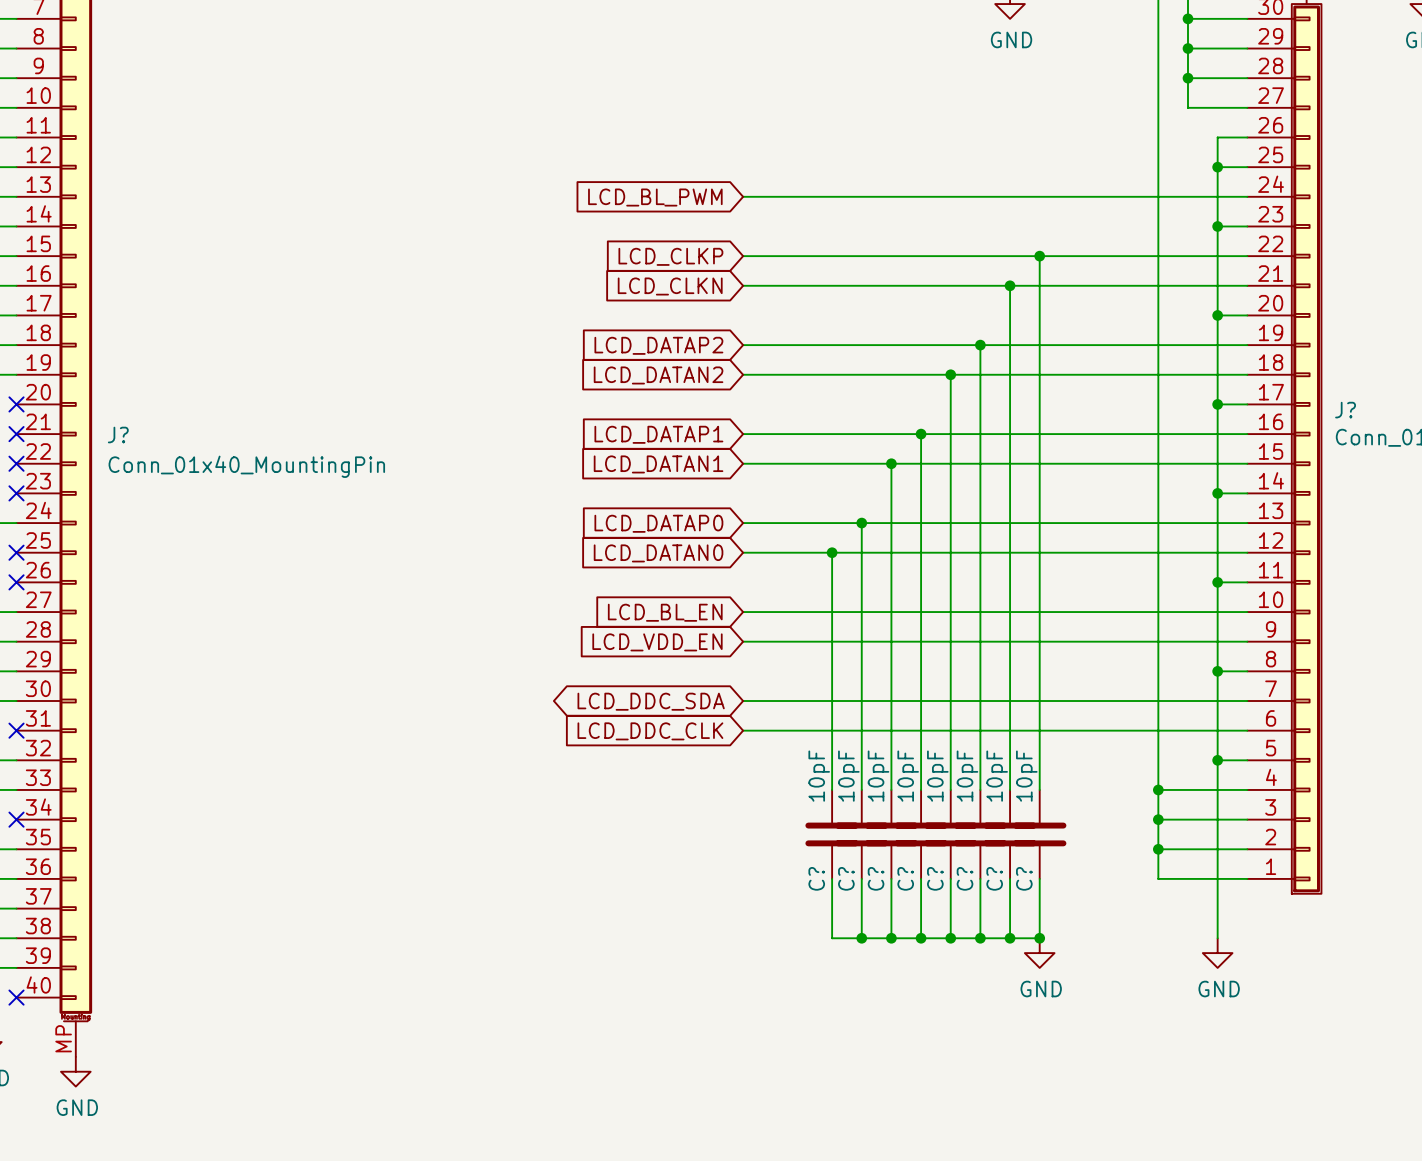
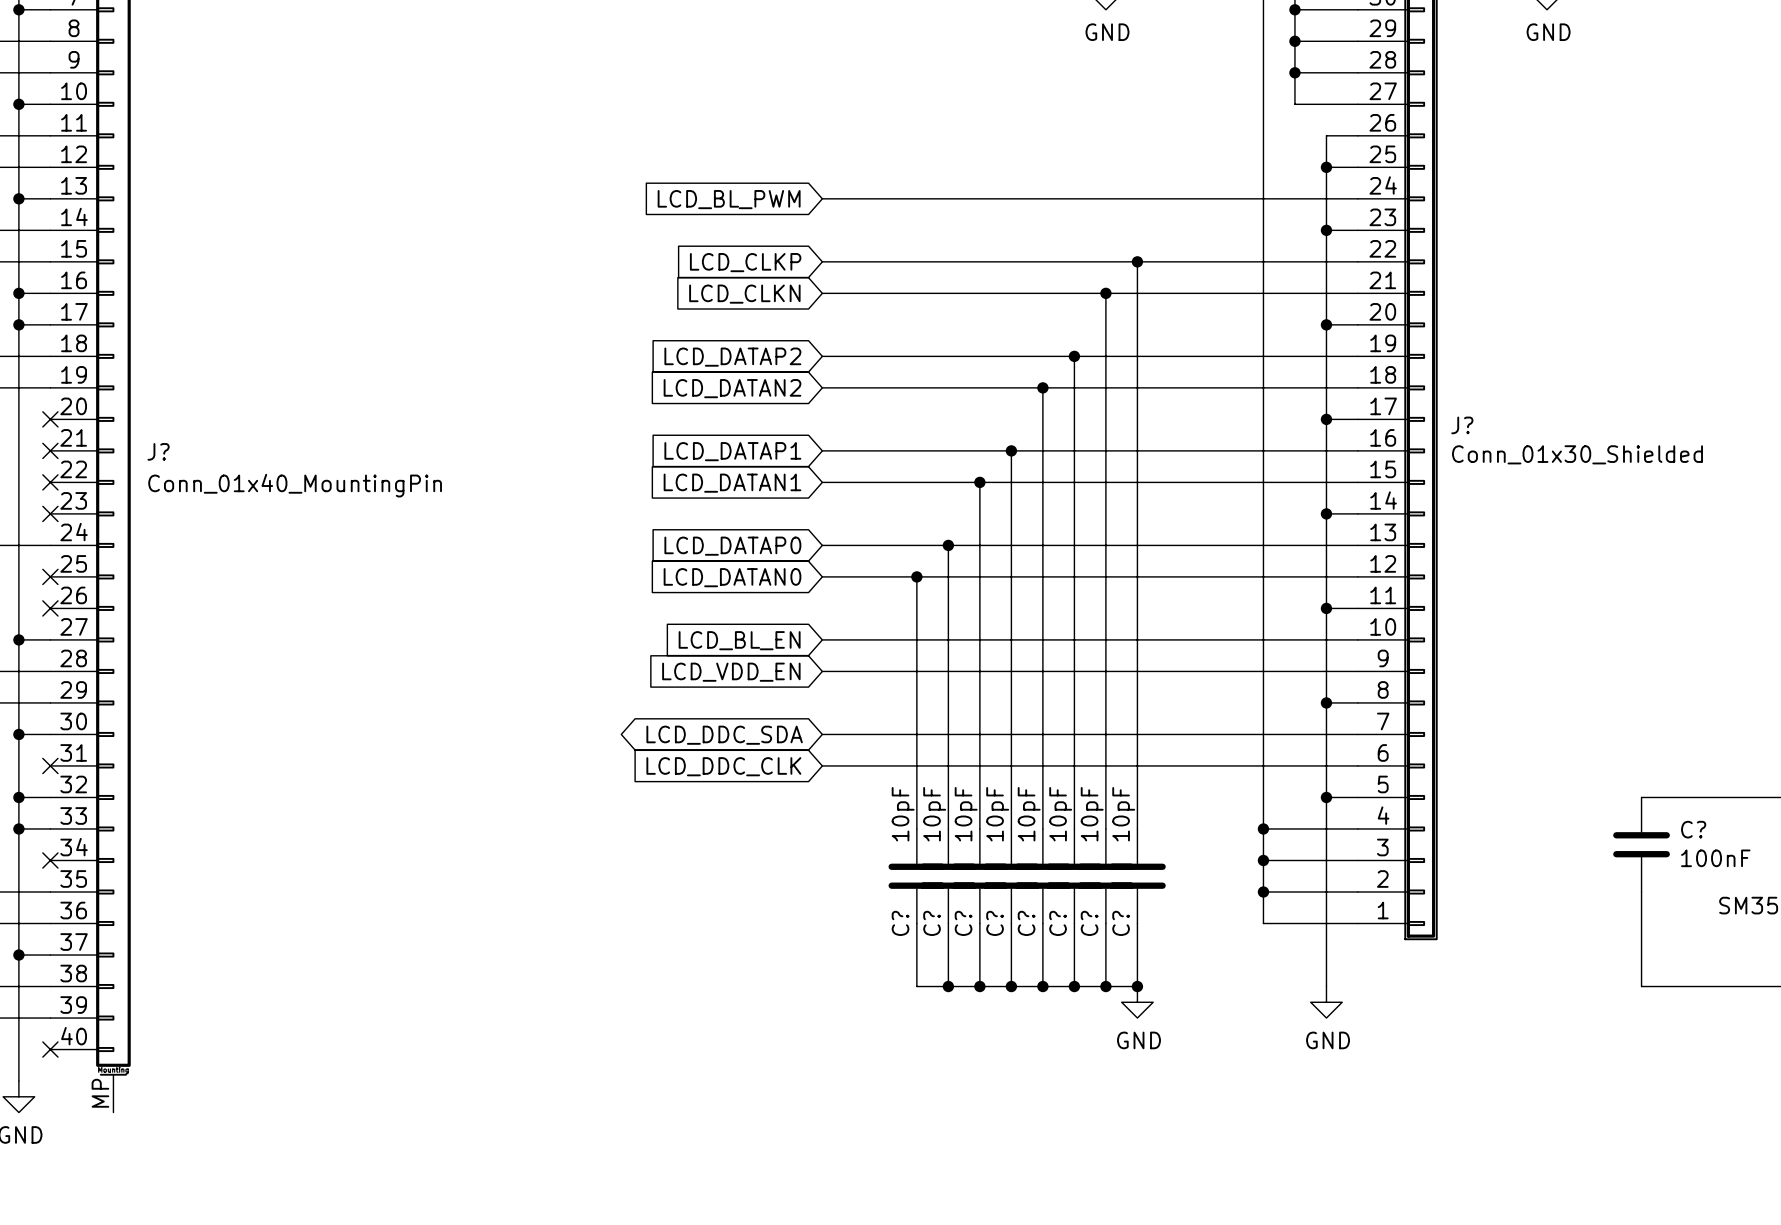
power symbol: GND (75, 1071) -> none

